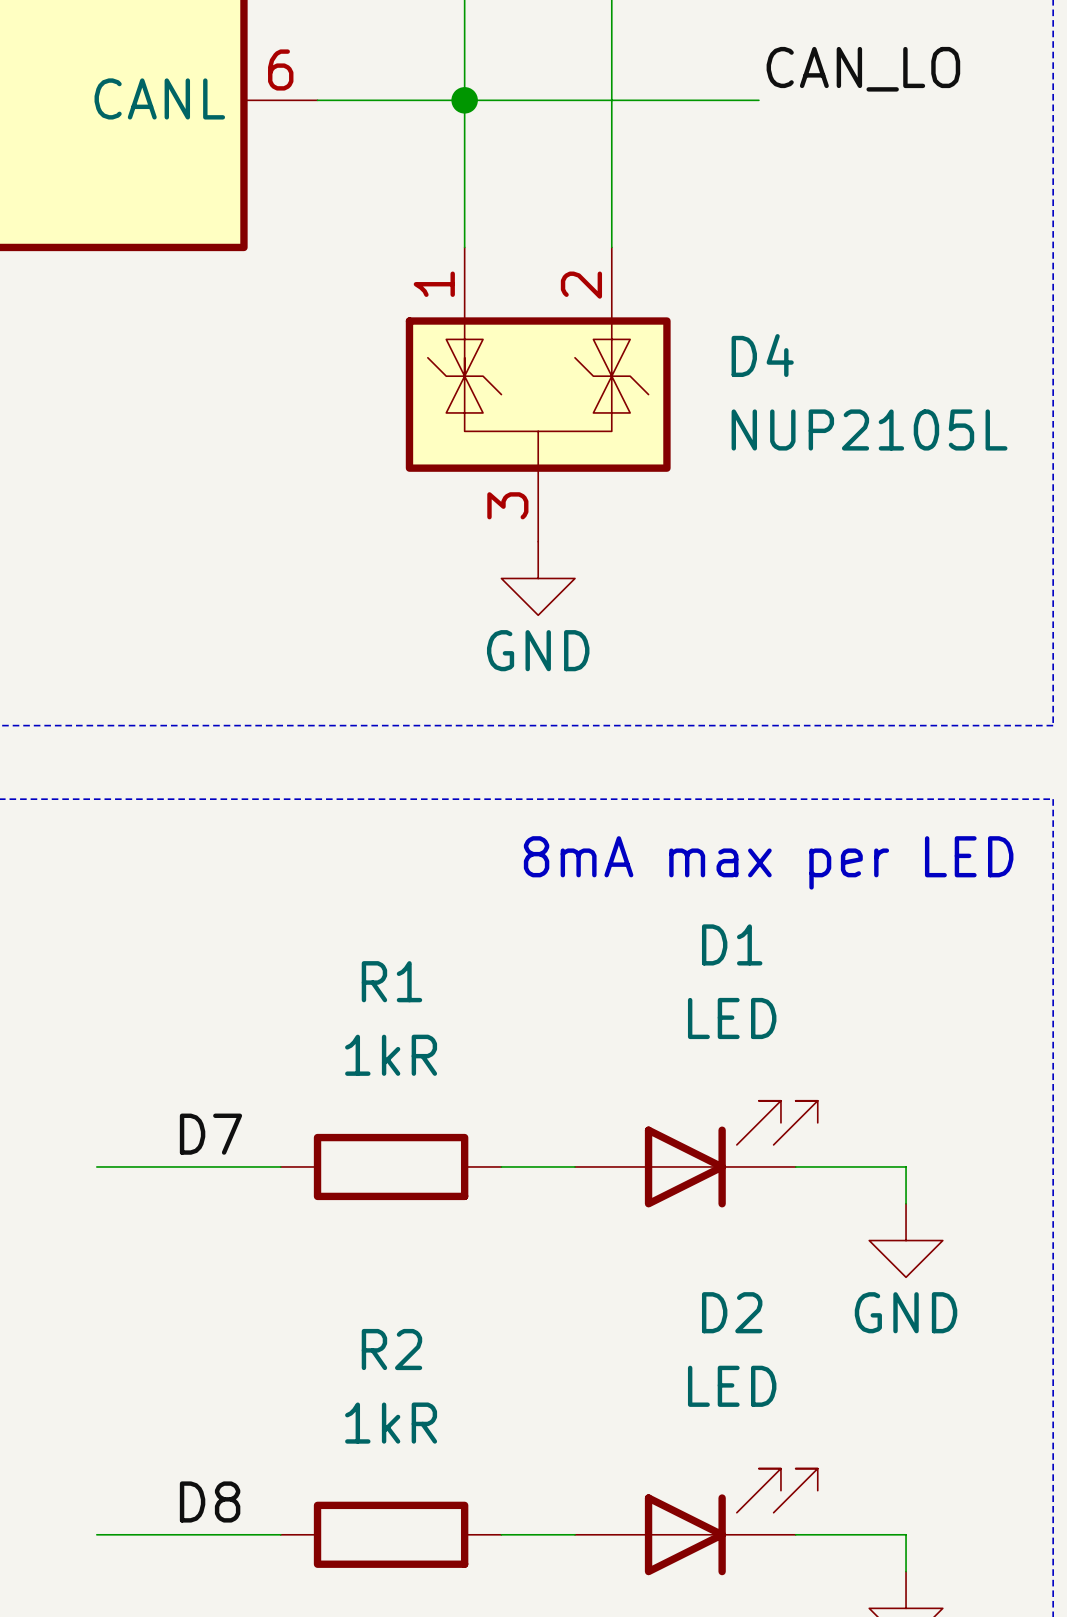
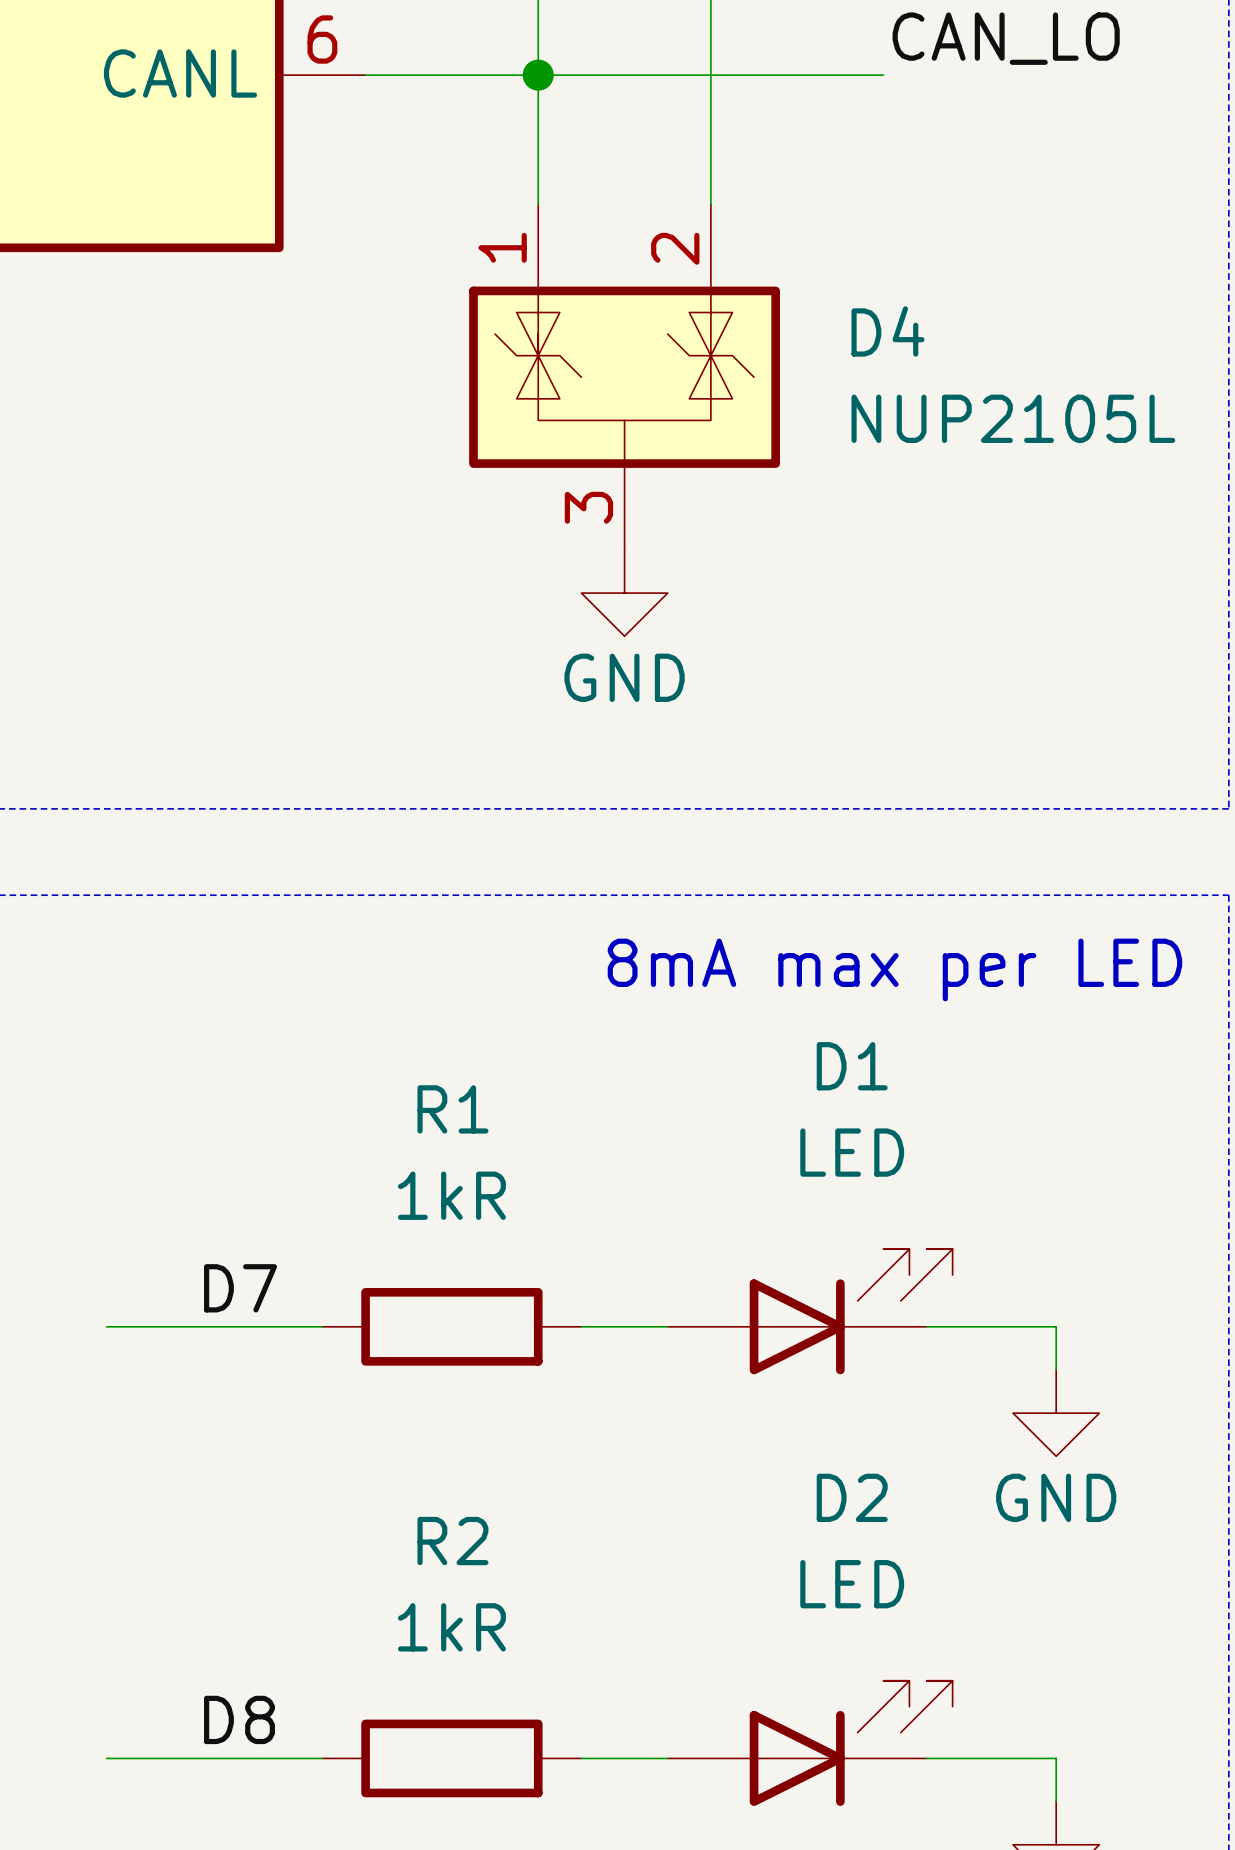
D4 position: (538, 394) -> (624, 377)
power symbol position: GND (538, 578) -> GND (624, 593)

